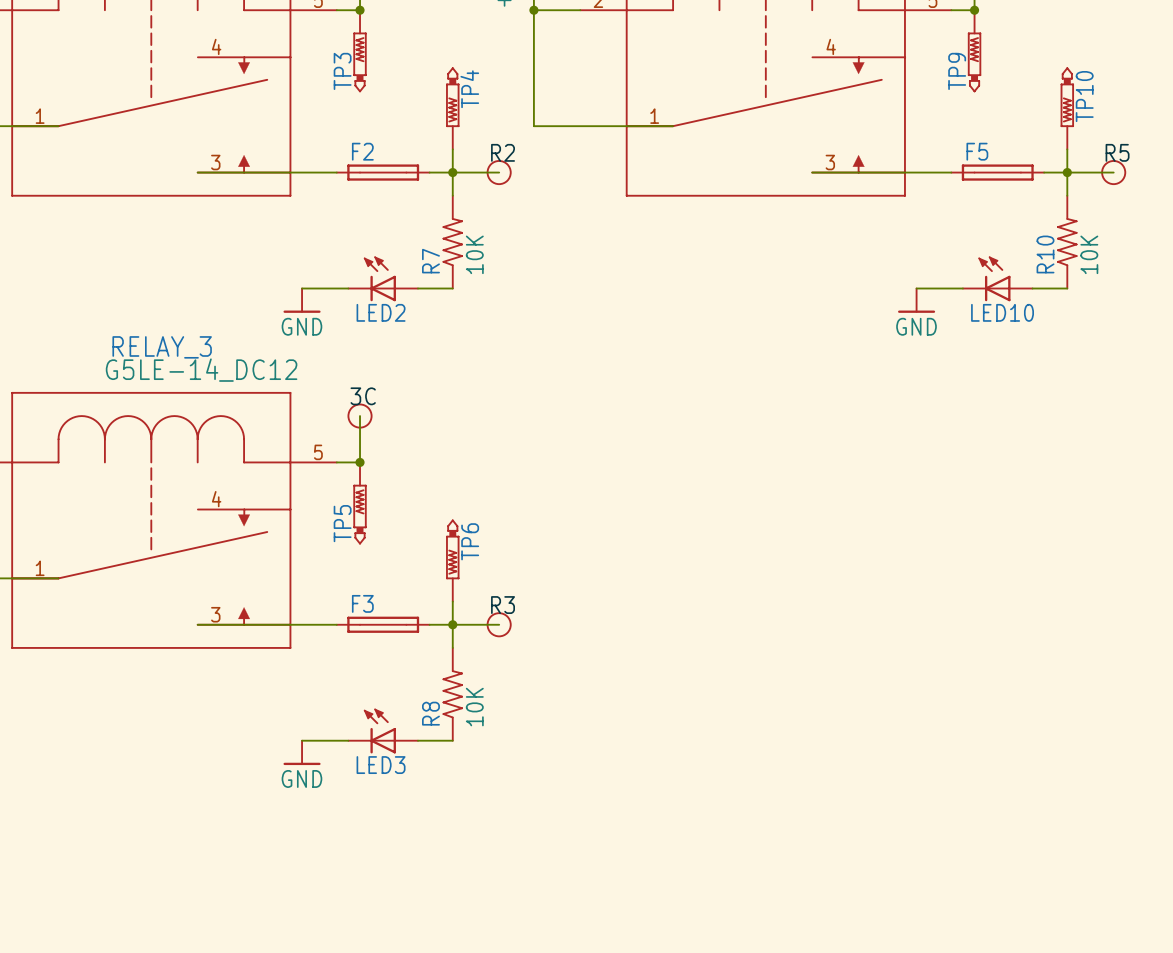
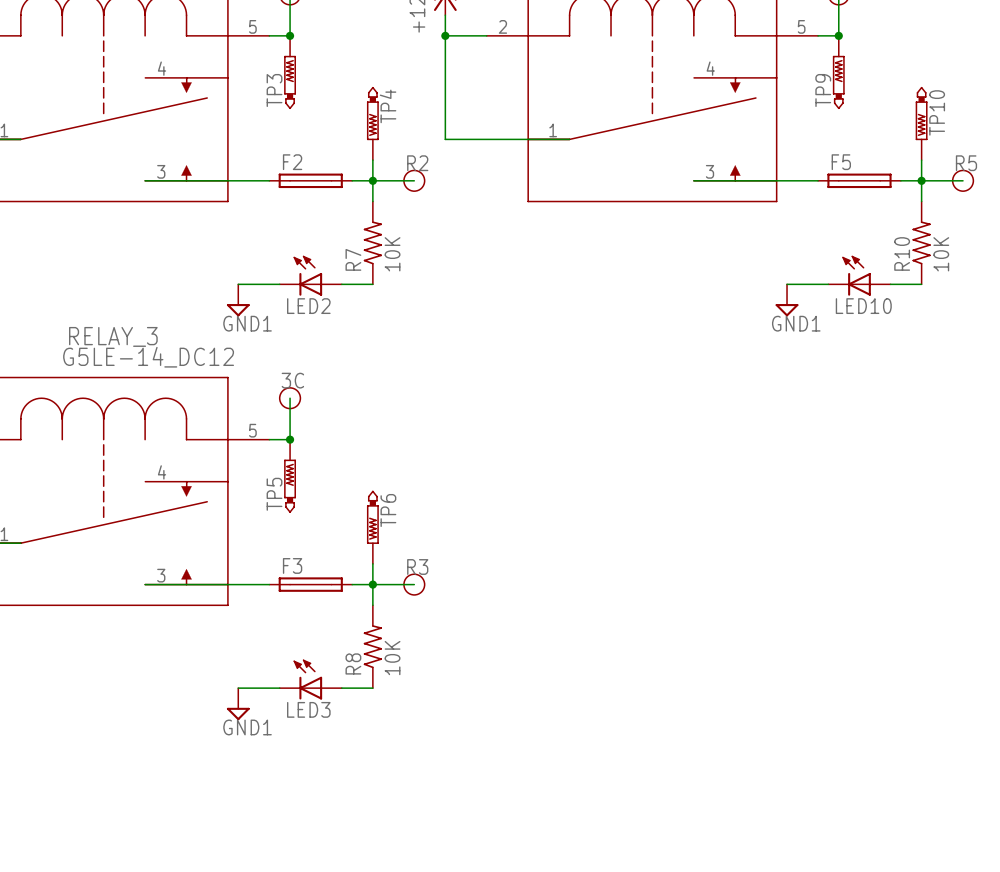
power symbol: GND (302, 300) -> GND1 (238, 300)
power symbol: GND (916, 300) -> GND1 (787, 300)
power symbol: GND (302, 752) -> GND1 (238, 704)

